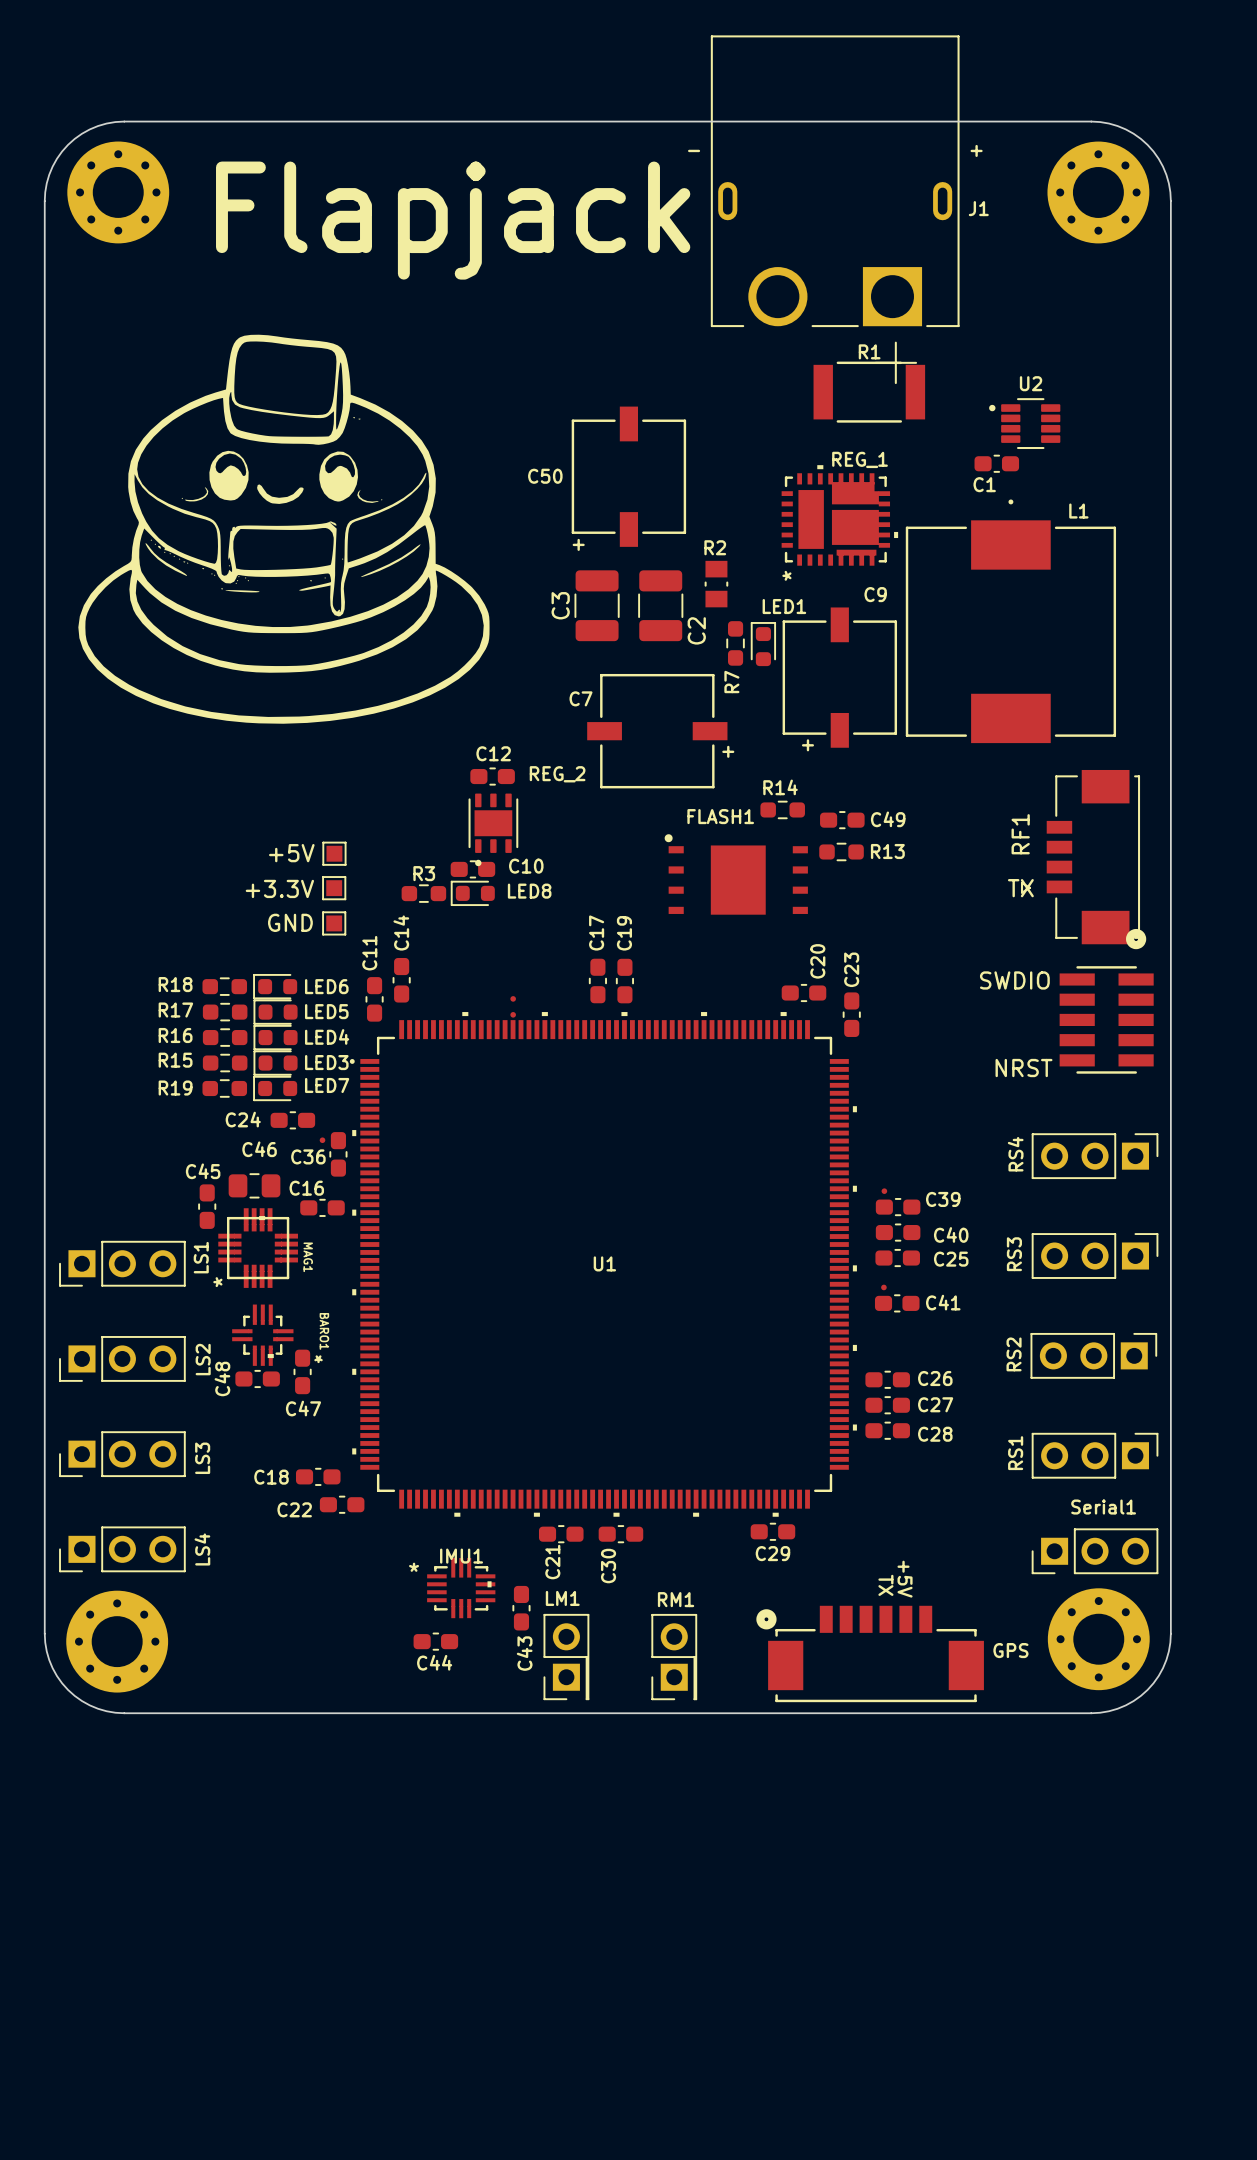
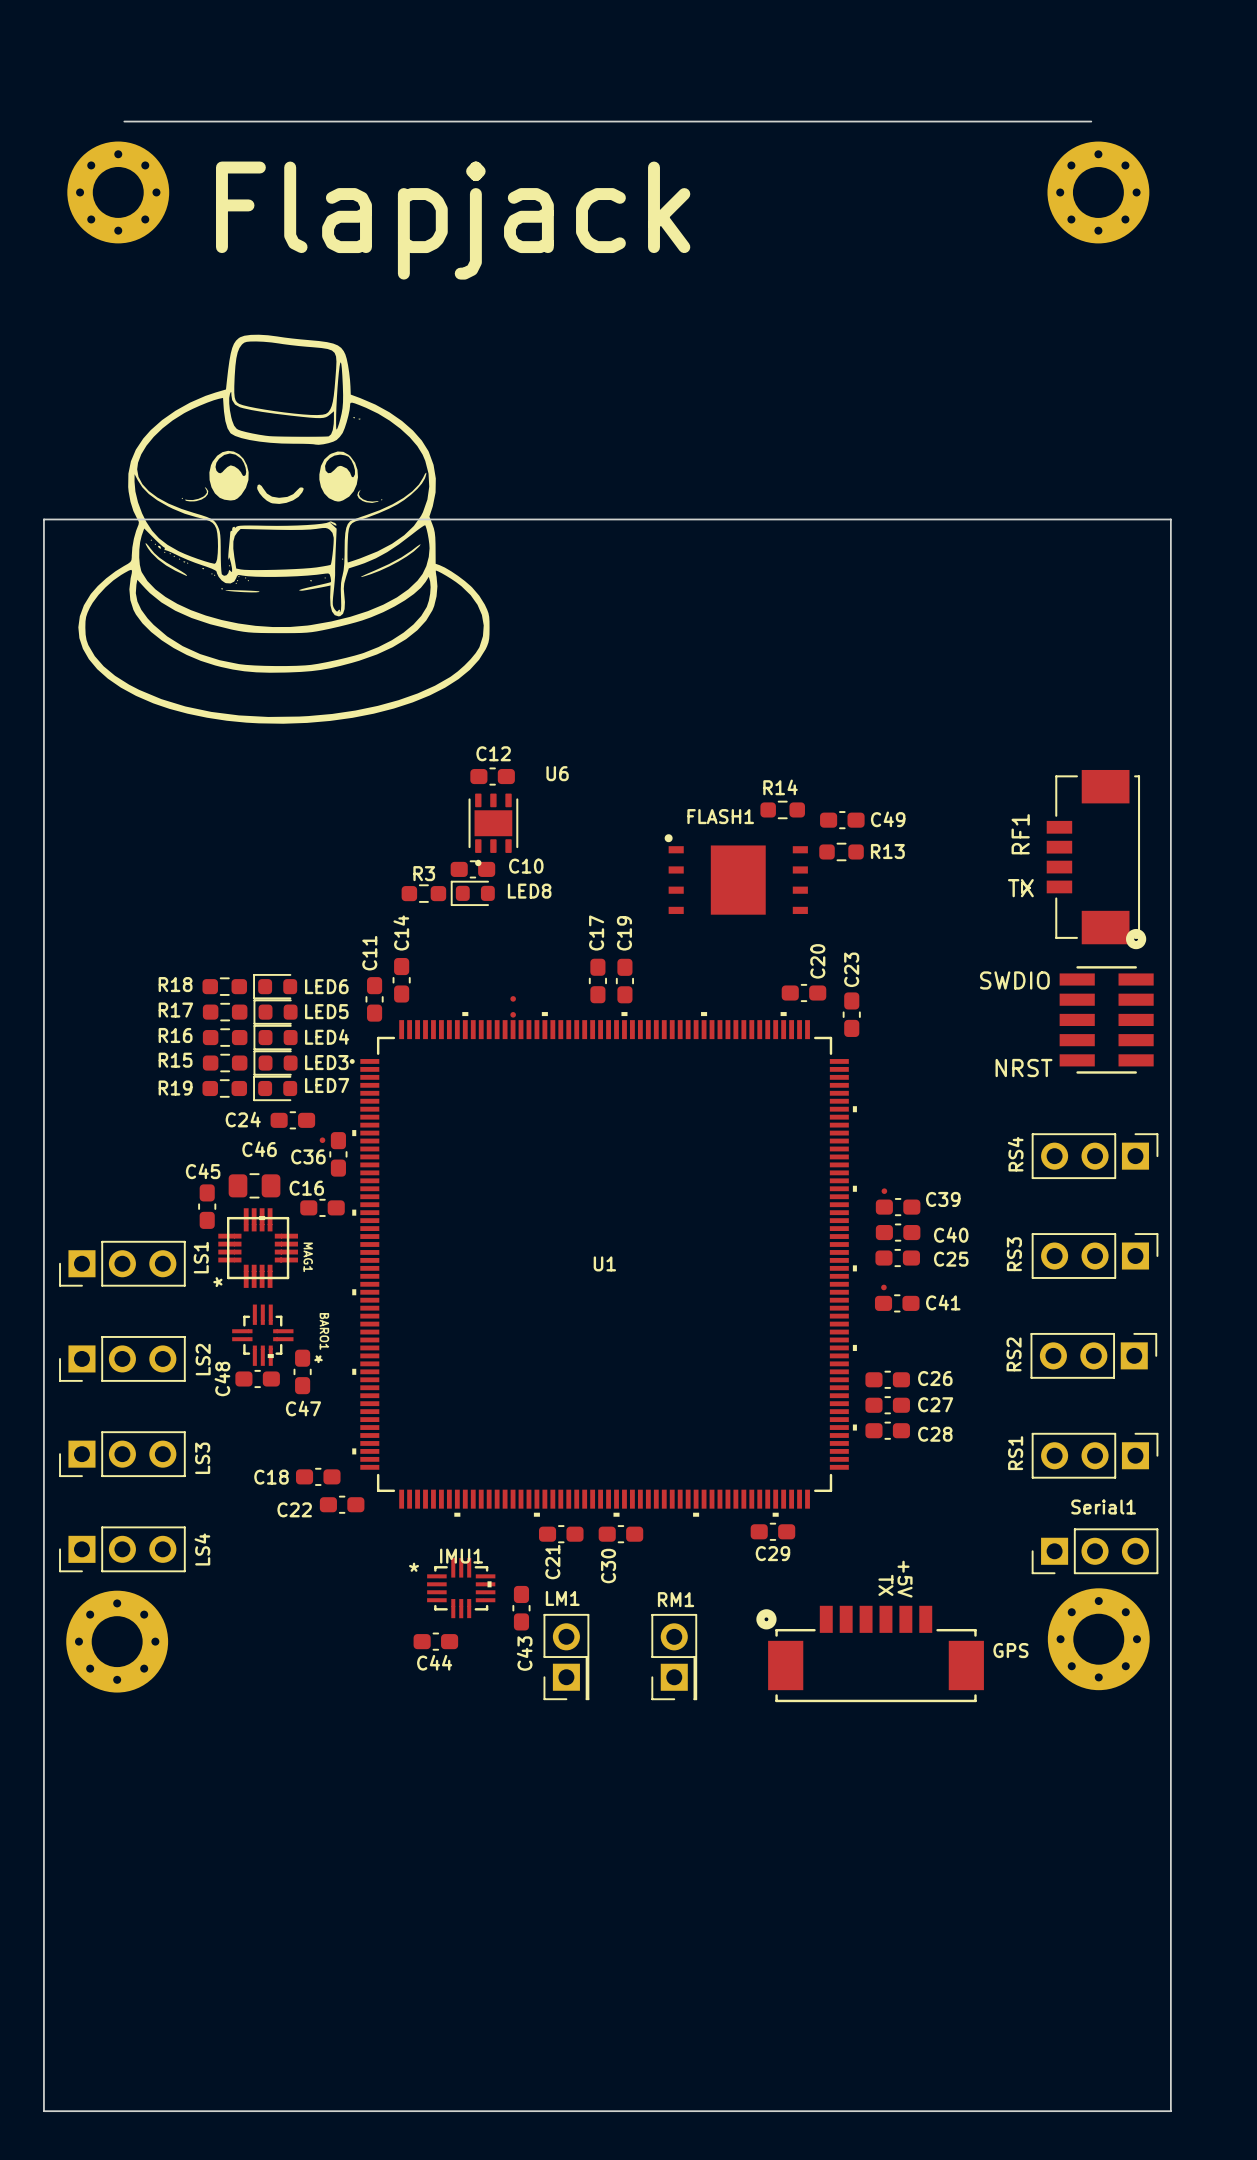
board edge: (124, 121) (106, 123) (89, 129) (68, 144) (52, 166) (46, 183) (44, 201) (44, 1633) (46, 1651) (56, 1676) (68, 1689) (82, 1701) (106, 1711) (124, 1713) (1091, 1713) (1109, 1711) (1125, 1705) (1147, 1689) (1158, 1676) (1166, 1659) (1170, 1633) -> (1170, 519) (43, 519) (43, 2111) (1170, 2111) (1170, 1633)
board edge: (1091, 121) (1117, 126) (1140, 138) (1158, 158) (1168, 183) (1170, 201) (1170, 519) -> none
text: - (694, 150) -> none
text: + (976, 150) -> none
J1: (835, 209) -> none
R1: (869, 392) -> none
U2: (1024, 423) -> none
C1: (996, 463) -> none
C50: (628, 476) -> none
REG_1: (839, 515) -> none
text: + (578, 544) -> none
R2: (716, 584) -> none
C3: (597, 605) -> none
C2: (660, 605) -> none
L1: (1010, 621) -> none
R7: (735, 643) -> none
LED1: (763, 644) -> none
C9: (839, 677) -> none
C7: (657, 731) -> none
text: + (807, 745) -> none
text: + (728, 751) -> none
REG_2 name: REG_2 (557, 774) -> U6 (557, 773)
+5V: (334, 853) -> none
+3.3V: (334, 888) -> none
GND: (334, 923) -> none

